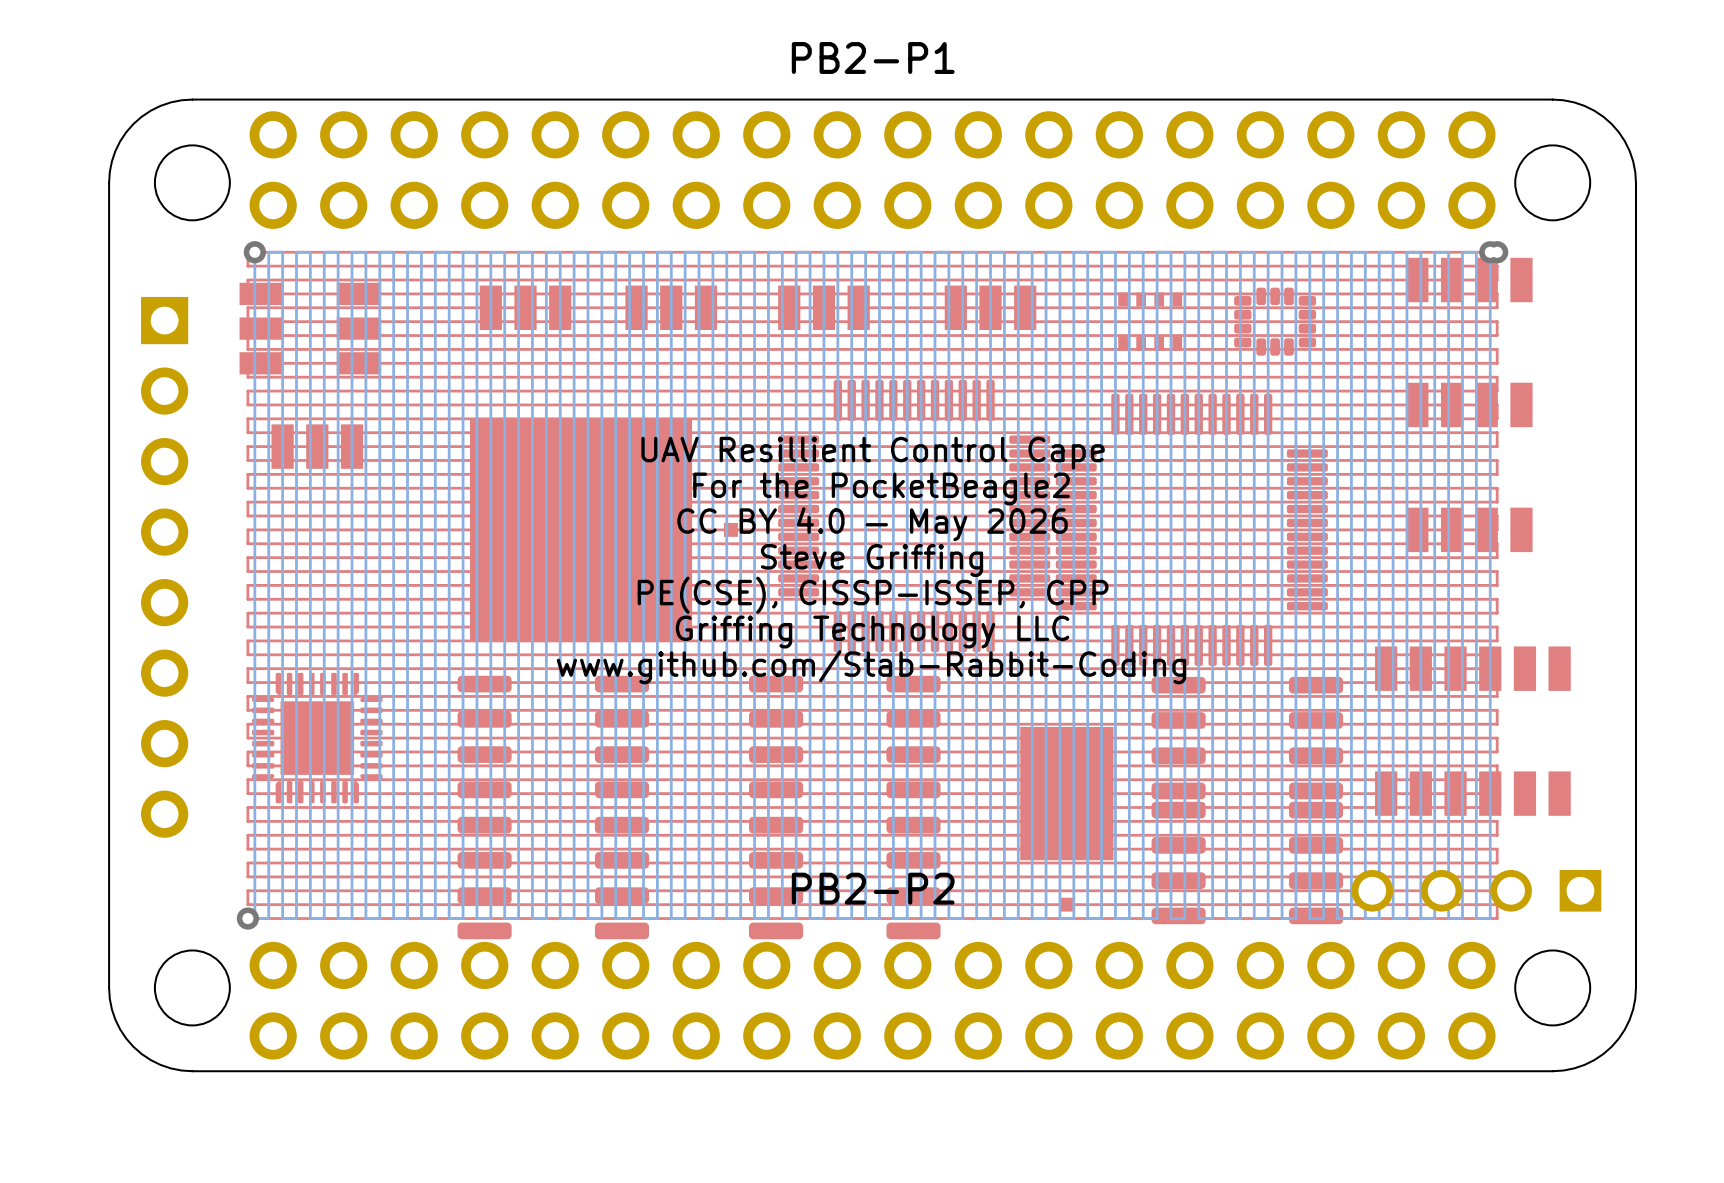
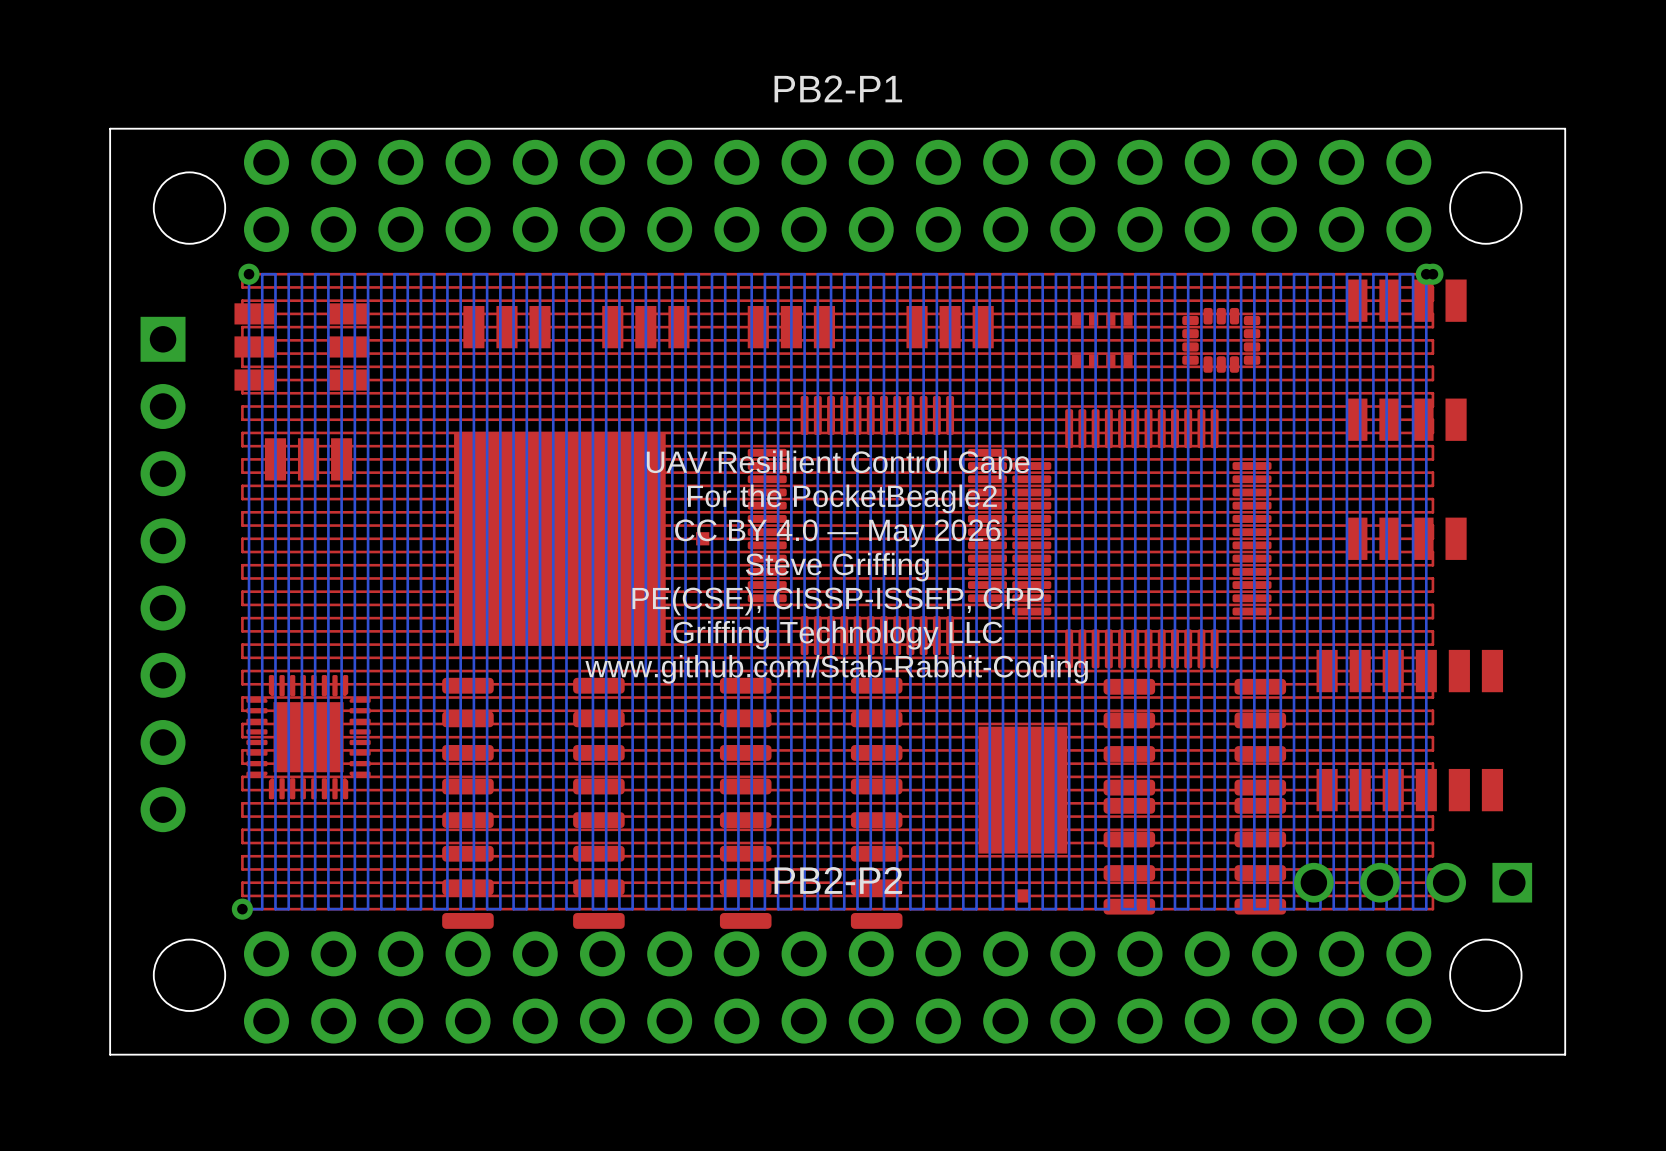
board edge: (192, 99) (160, 105) (133, 123) (115, 150) (109, 182) -> (189, 128) (110, 128) (110, 208)
board edge: (1552, 99) (1584, 105) (1611, 123) (1629, 150) (1635, 182) -> (1485, 128) (1565, 128) (1565, 208)
board edge: (109, 987) (115, 1019) (133, 1046) (160, 1064) (192, 1071) -> (110, 975) (110, 1054) (189, 1054)
board edge: (1635, 987) (1629, 1019) (1611, 1046) (1584, 1064) (1552, 1071) -> (1565, 975) (1565, 1054) (1485, 1054)

